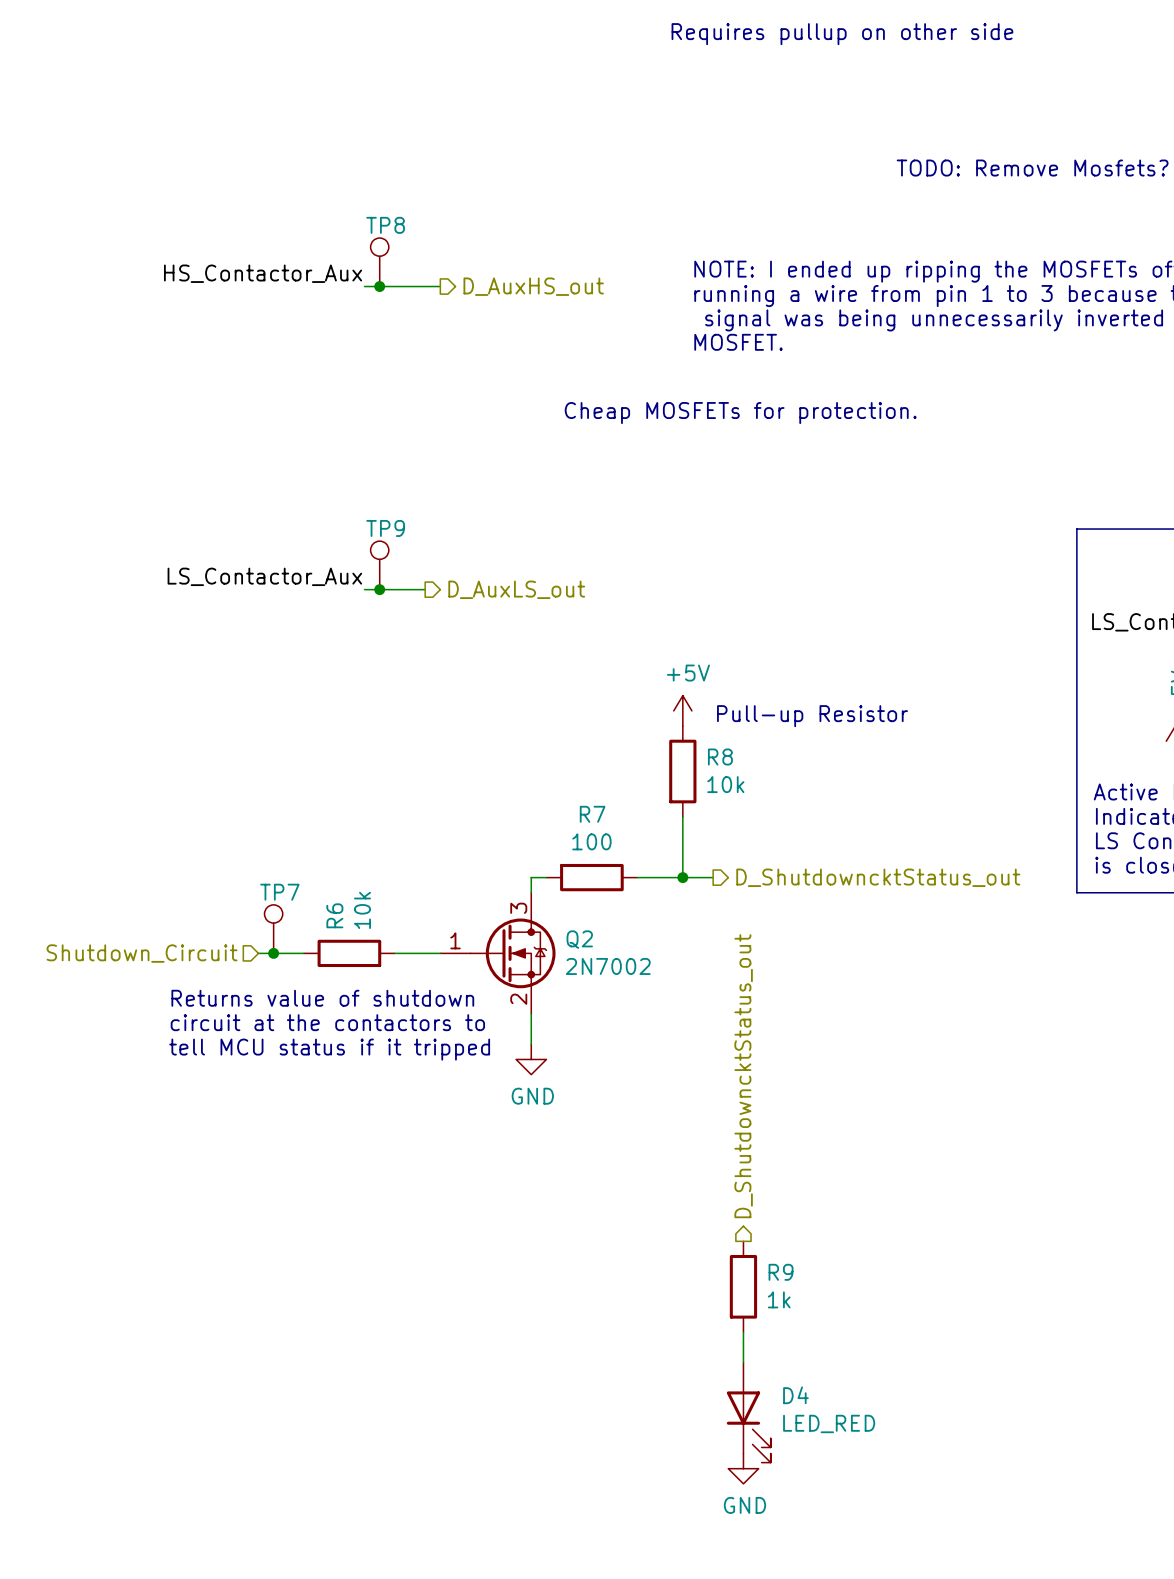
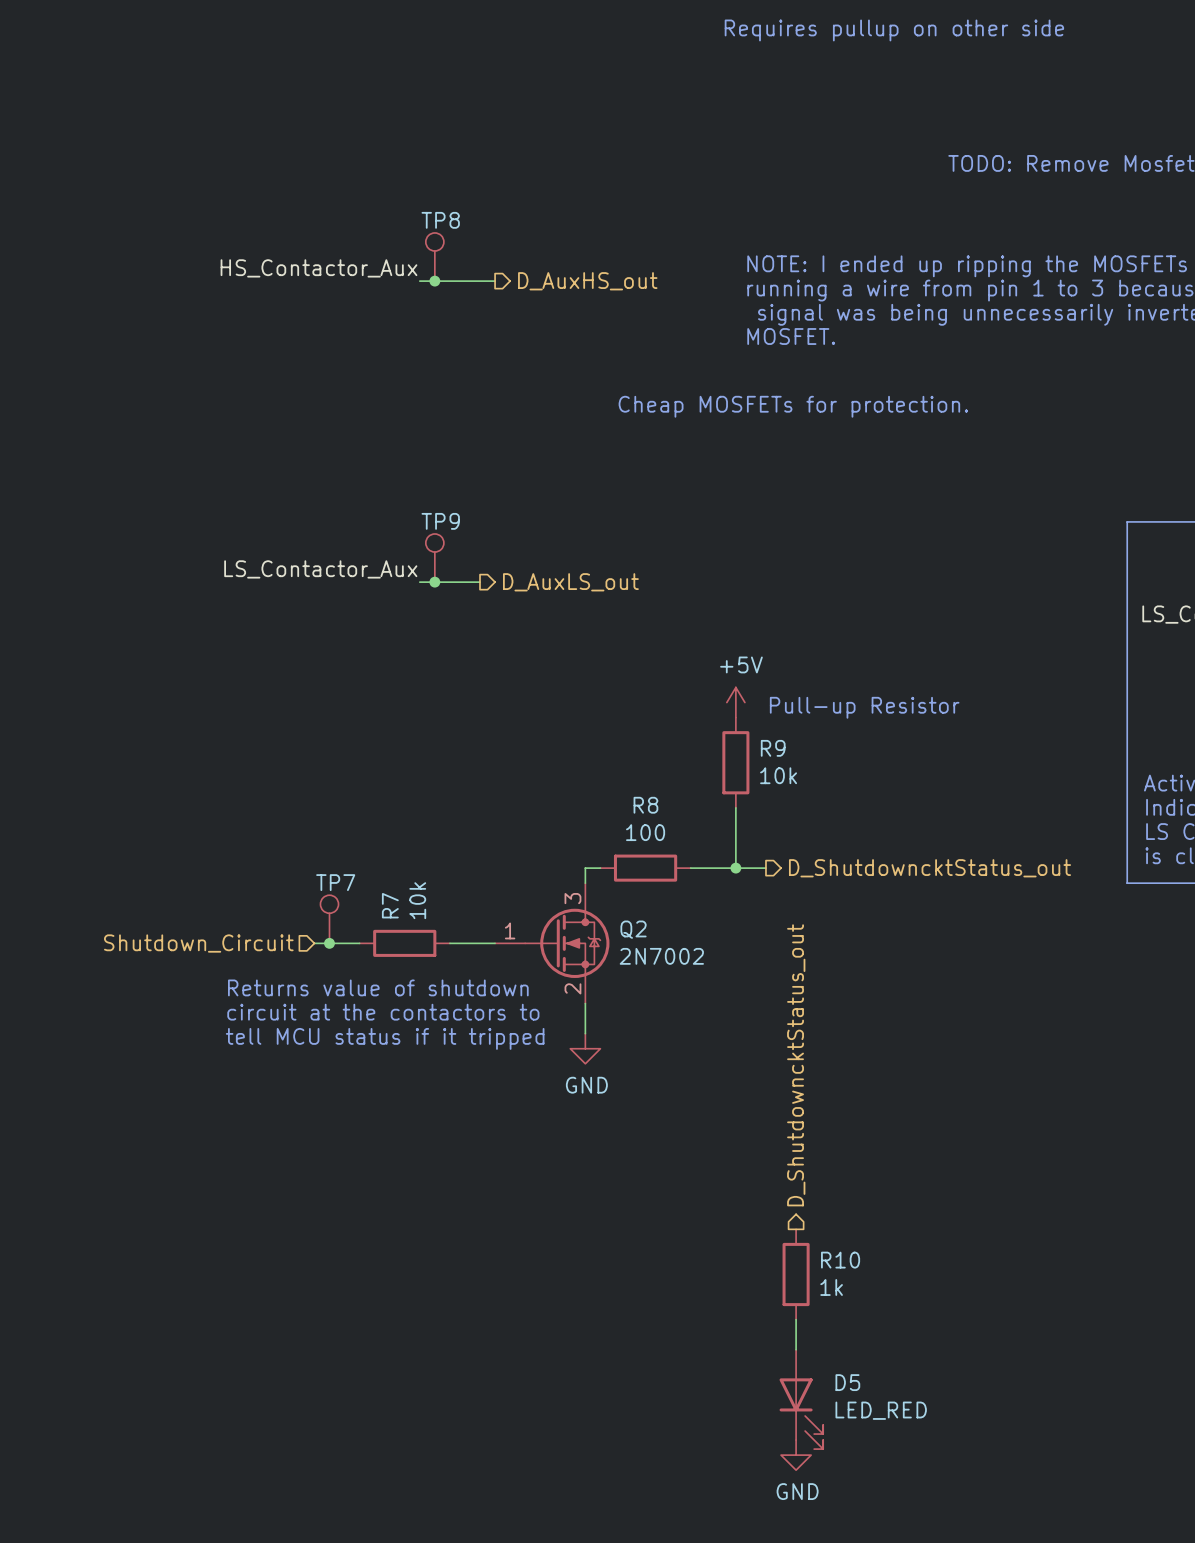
R8 name: R8 (720, 757) -> R9 (773, 748)
R7 name: R7 (592, 814) -> R8 (645, 805)
R6 name: R6 (334, 915) -> R7 (390, 905)
R9 name: R9 (781, 1272) -> R10 (840, 1260)
D4 name: D4 (795, 1395) -> D5 (847, 1382)

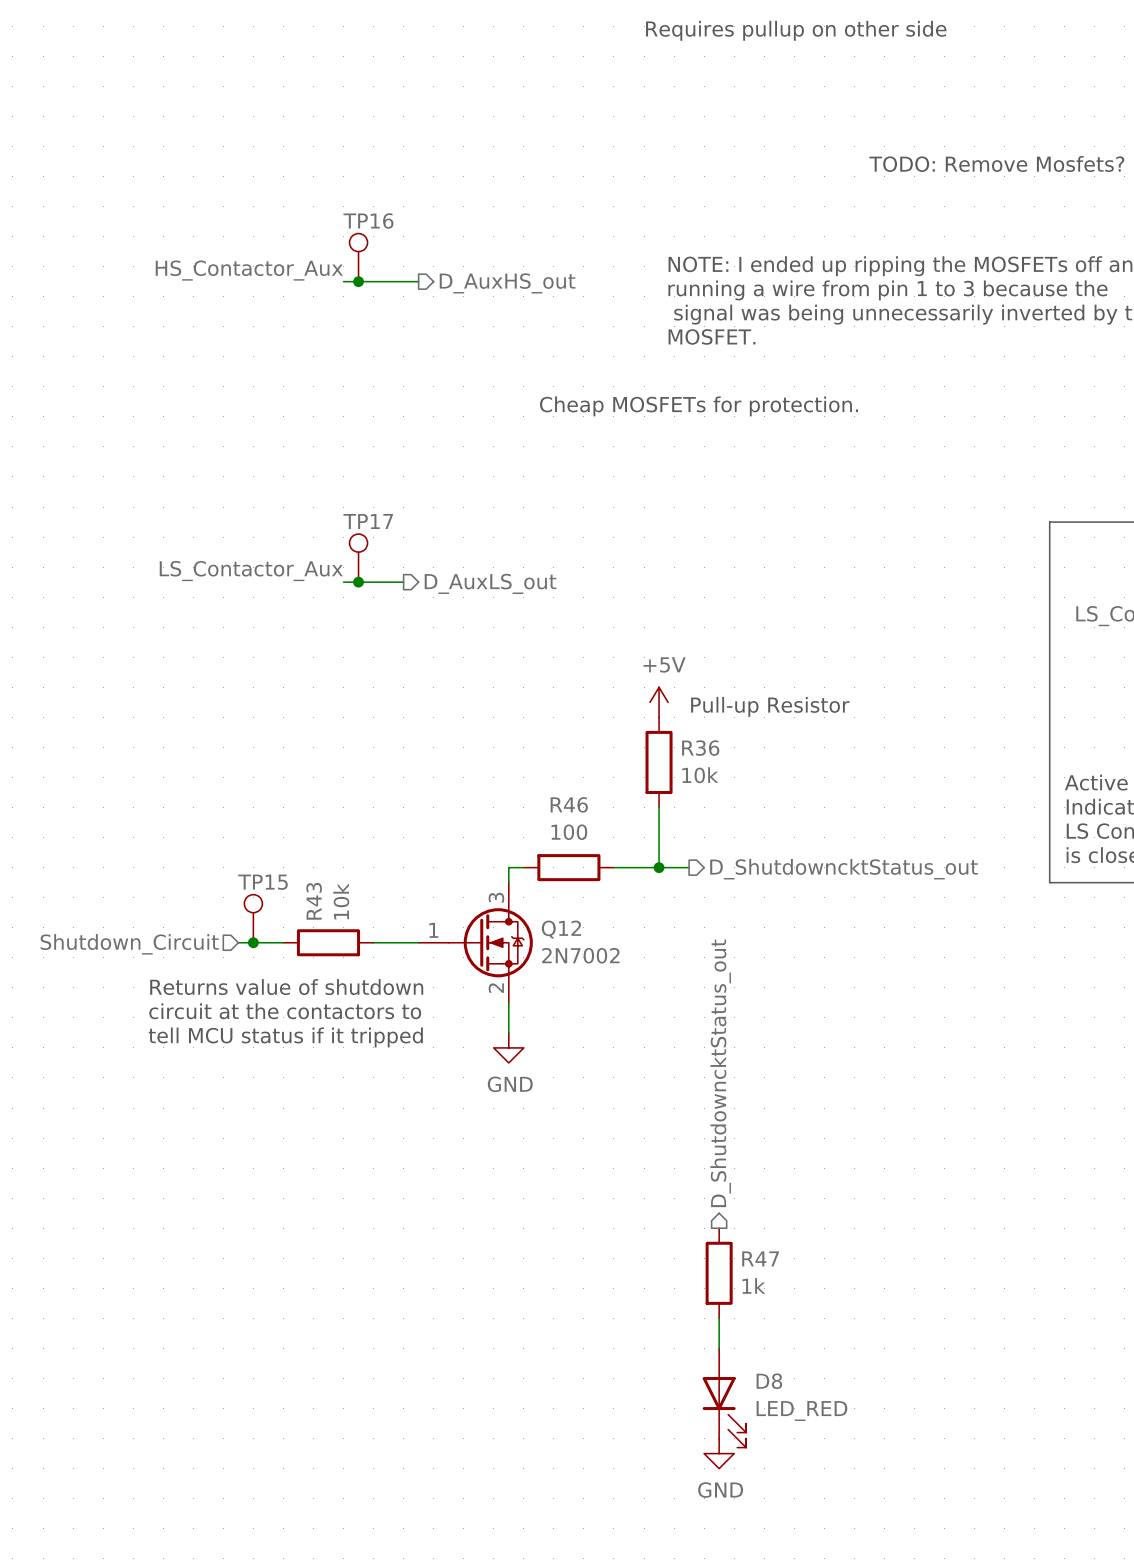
TP8 name: TP8 (440, 220) -> TP16 (368, 221)
TP9 name: TP9 (440, 521) -> TP17 (368, 521)
R9 name: R9 (773, 748) -> R36 (700, 748)
R8 name: R8 (645, 805) -> R46 (569, 804)
TP7 name: TP7 (335, 882) -> TP15 (263, 882)
R7 name: R7 (390, 905) -> R43 (314, 901)
Q2 name: Q2 (633, 929) -> Q12 (561, 929)
R10 name: R10 (840, 1260) -> R47 (760, 1258)
D5 name: D5 (847, 1382) -> D8 (769, 1381)

